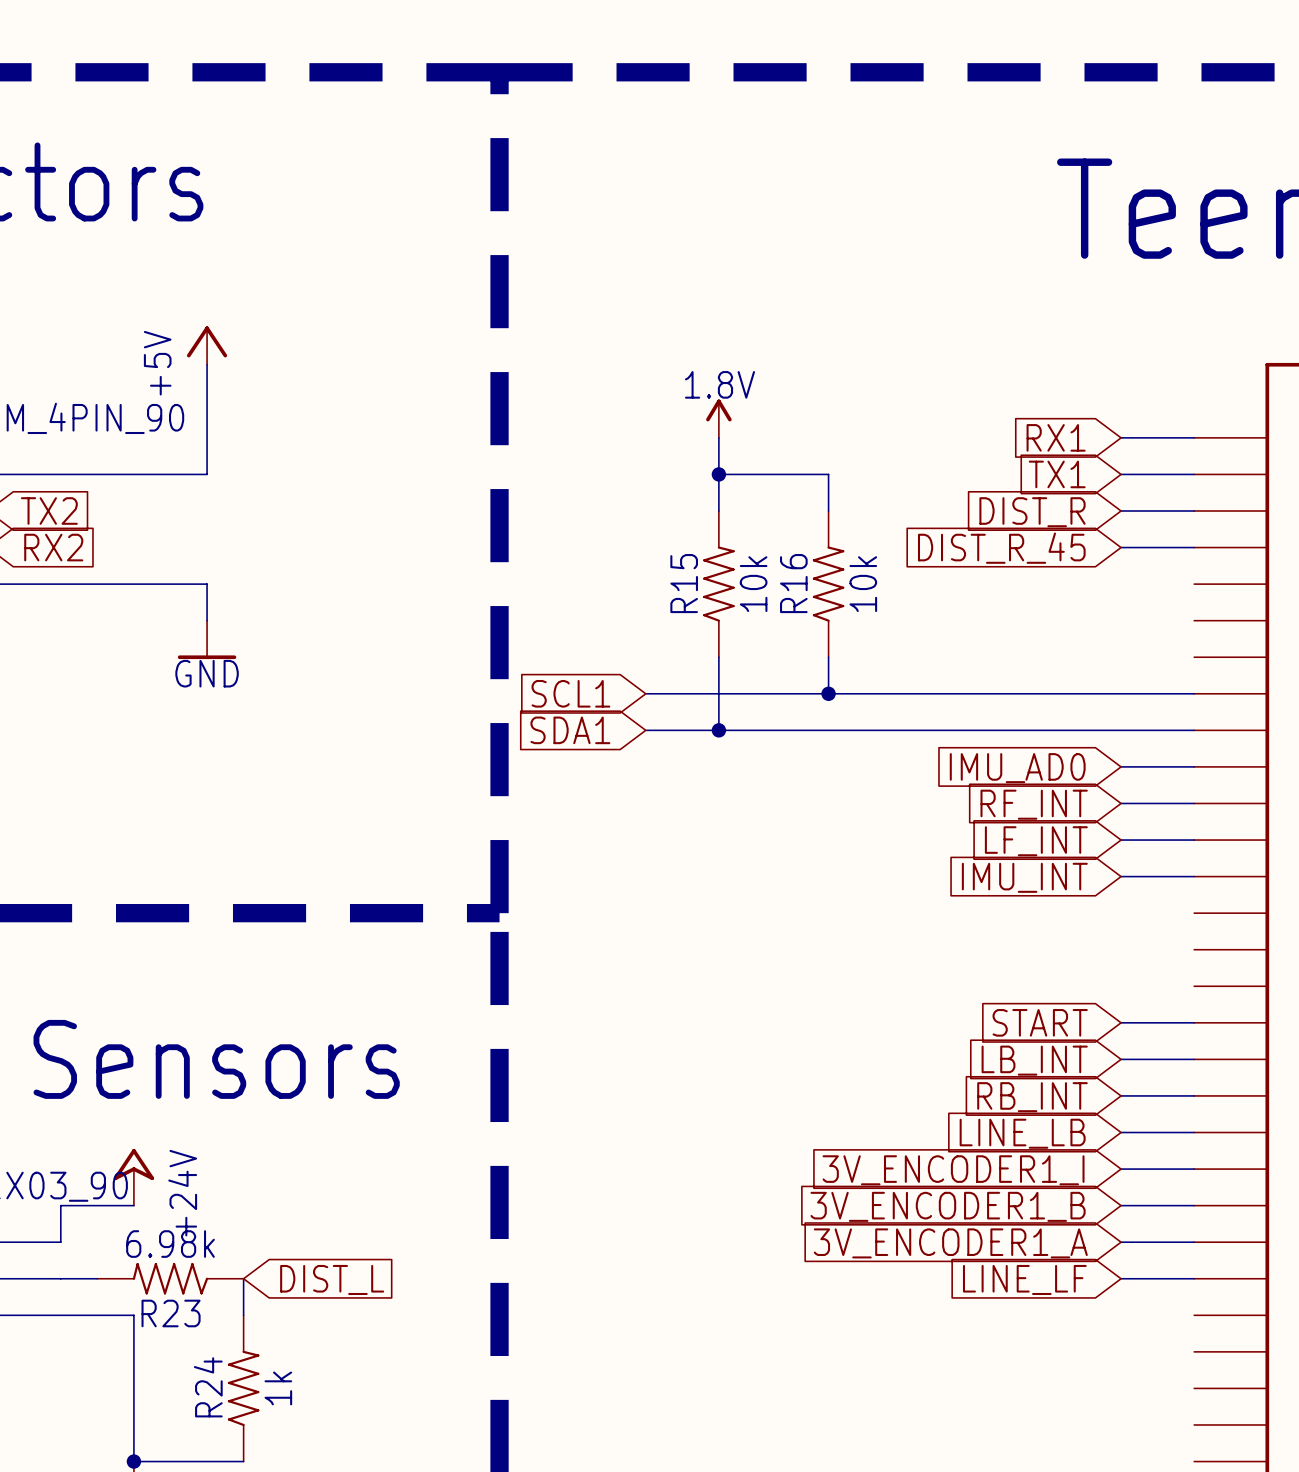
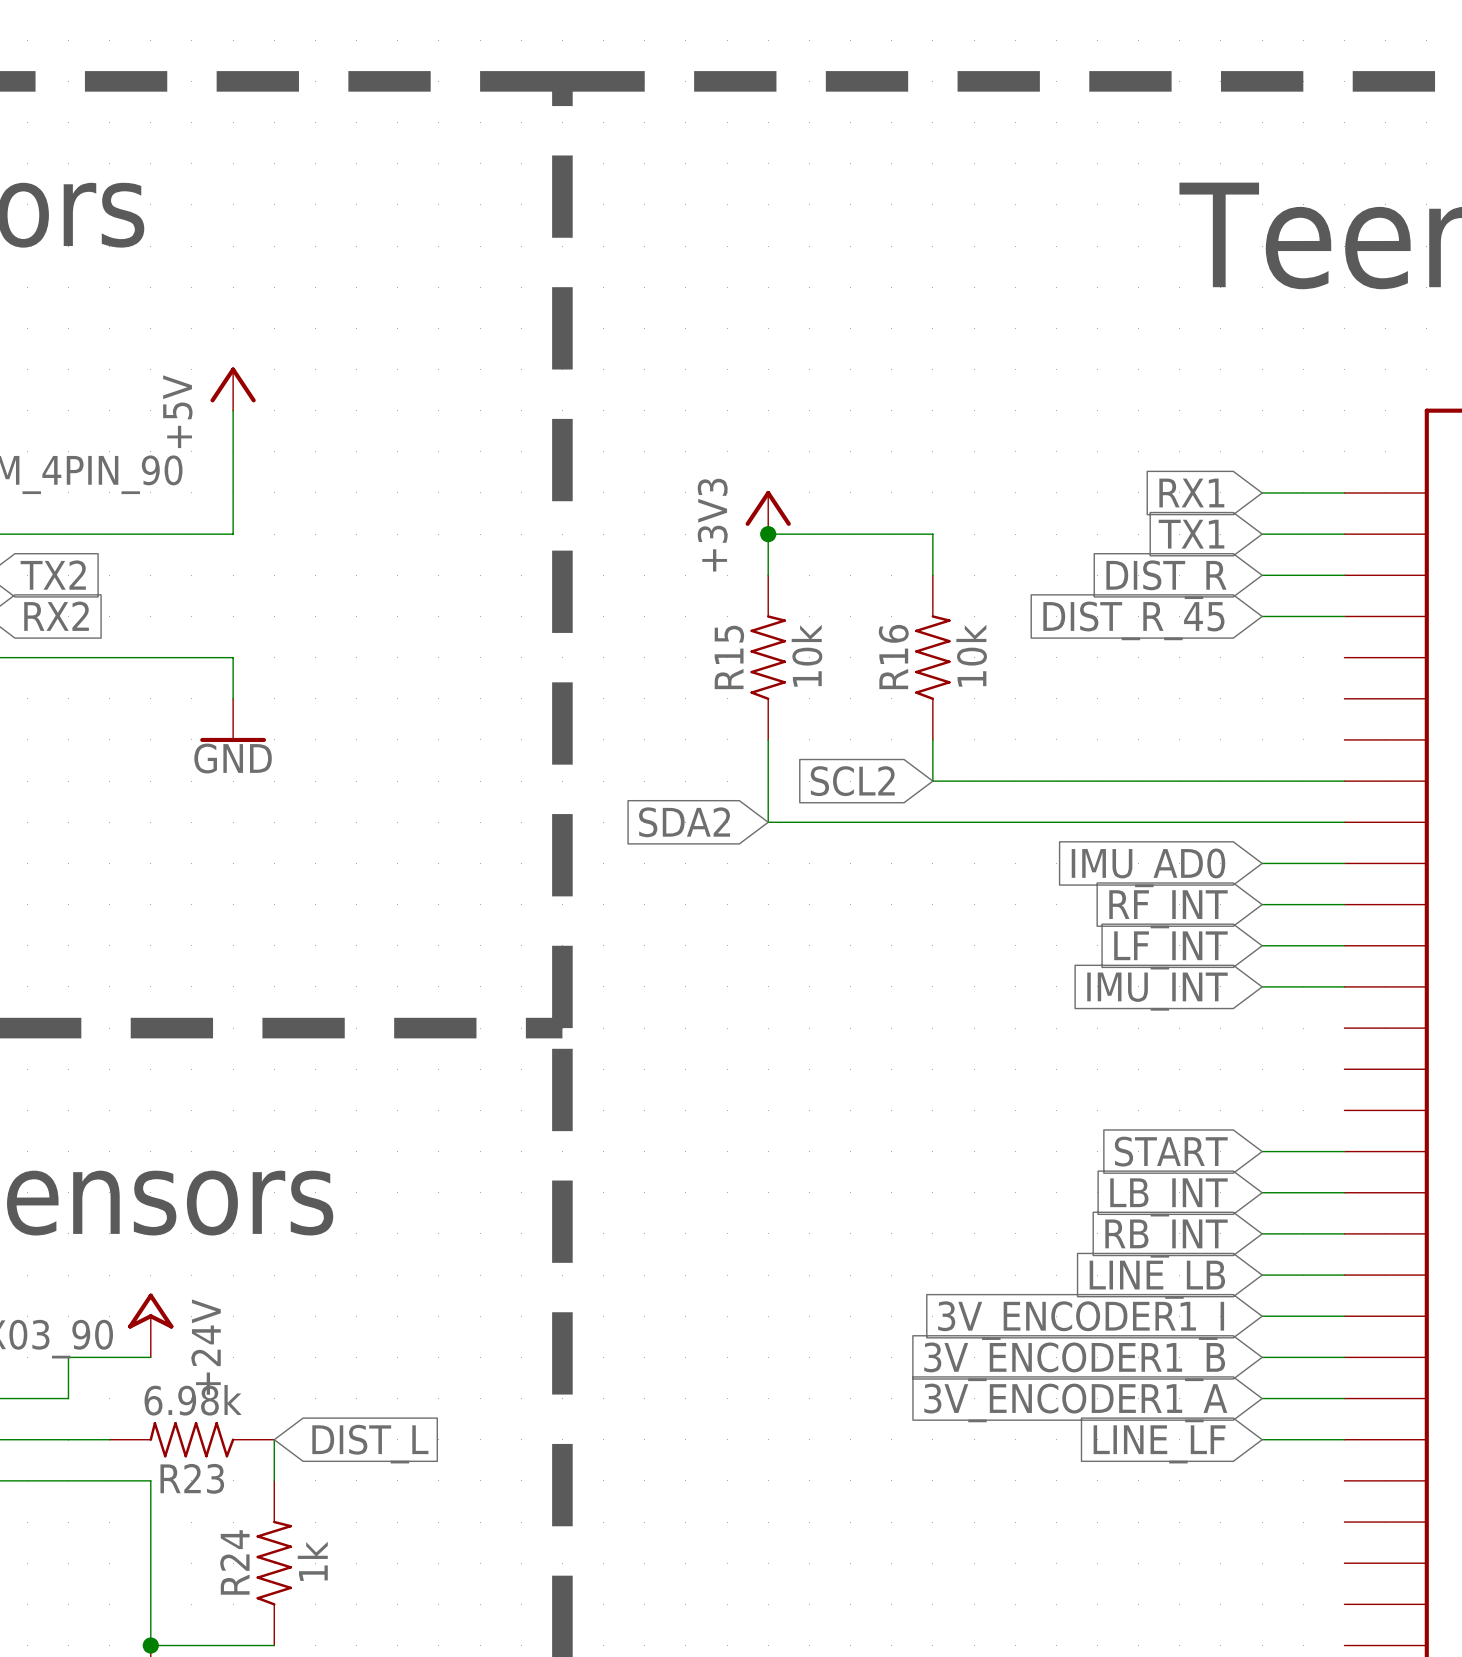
power symbol: 1.8V (718, 418) -> none
wire: (718, 437) (718, 510) -> none
power symbol: none -> +3V3 (768, 512)
wire: none -> (809, 534) (768, 534) (768, 575)
junction position: (718, 474) -> (768, 534)
R15 position: (718, 584) -> (768, 657)
wire: (718, 657) (718, 730) -> none
global label: SCL1 (570, 693) -> none
wire: (645, 693) (828, 693) -> none
global label: none -> SCL2 (852, 781)
junction: (828, 693) -> none
global label: SDA1 (570, 730) -> SDA2 (684, 822)
wire: (645, 730) (682, 730) -> (768, 739) (768, 822)
junction: (718, 730) -> none

